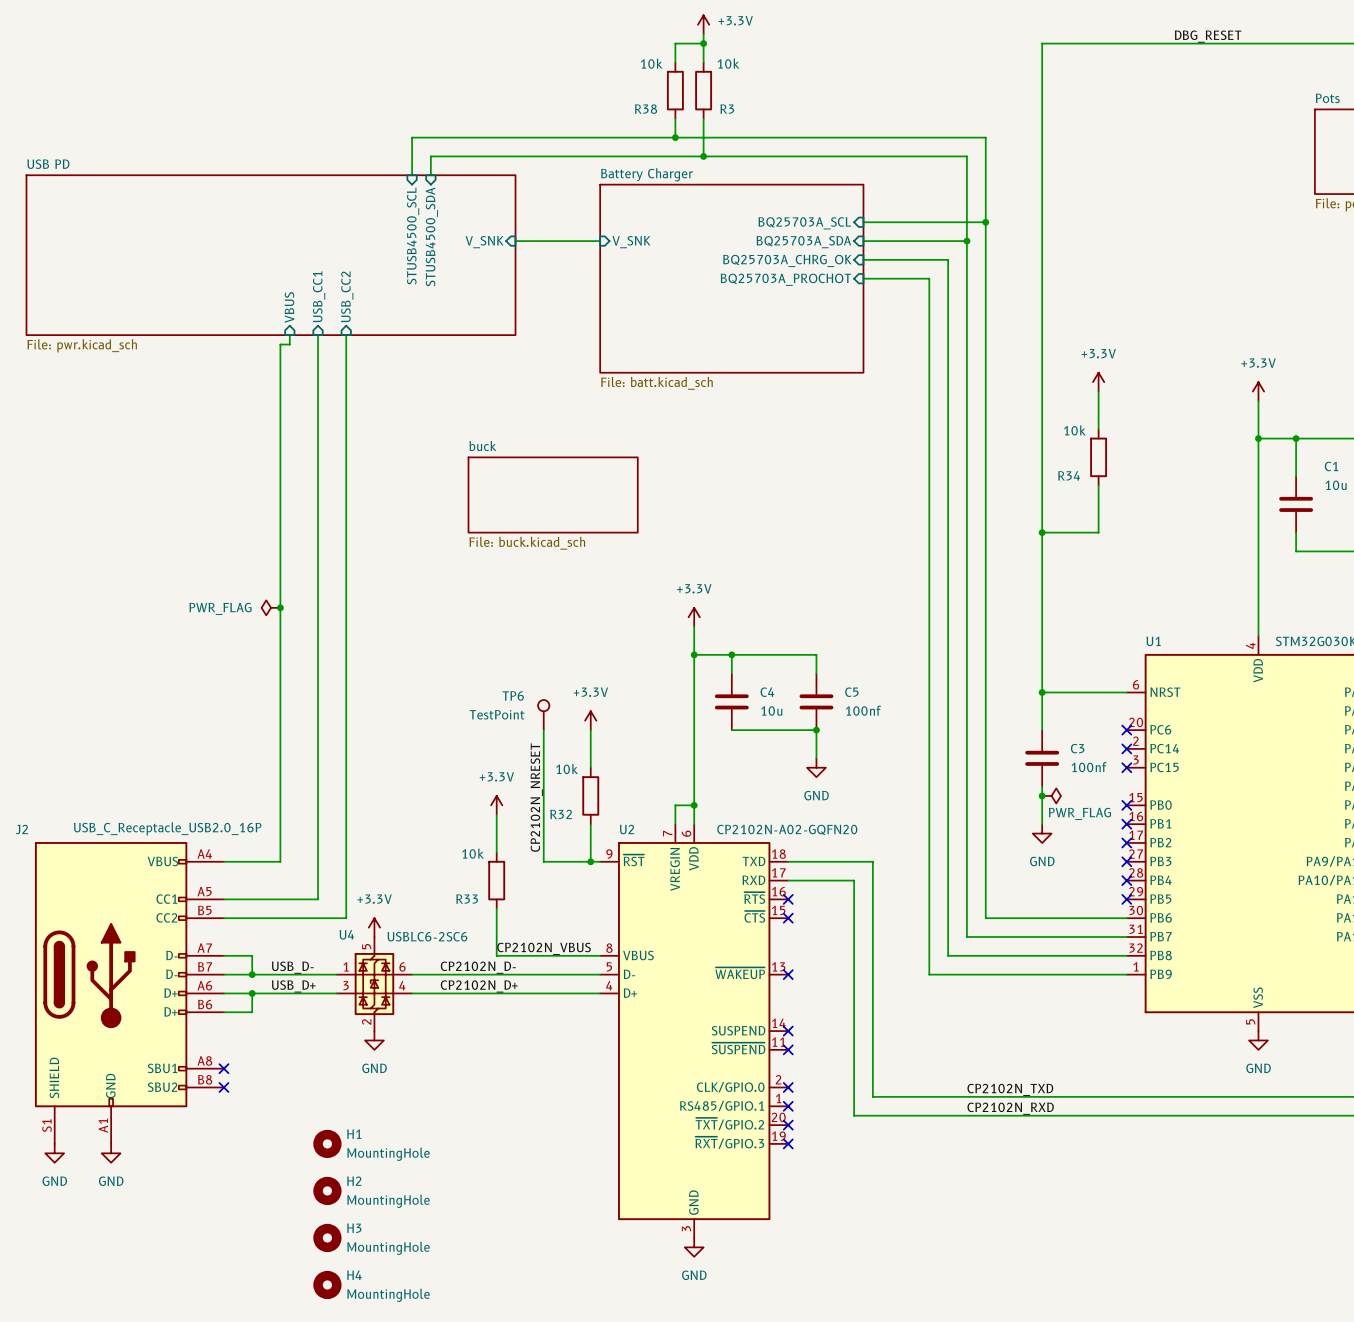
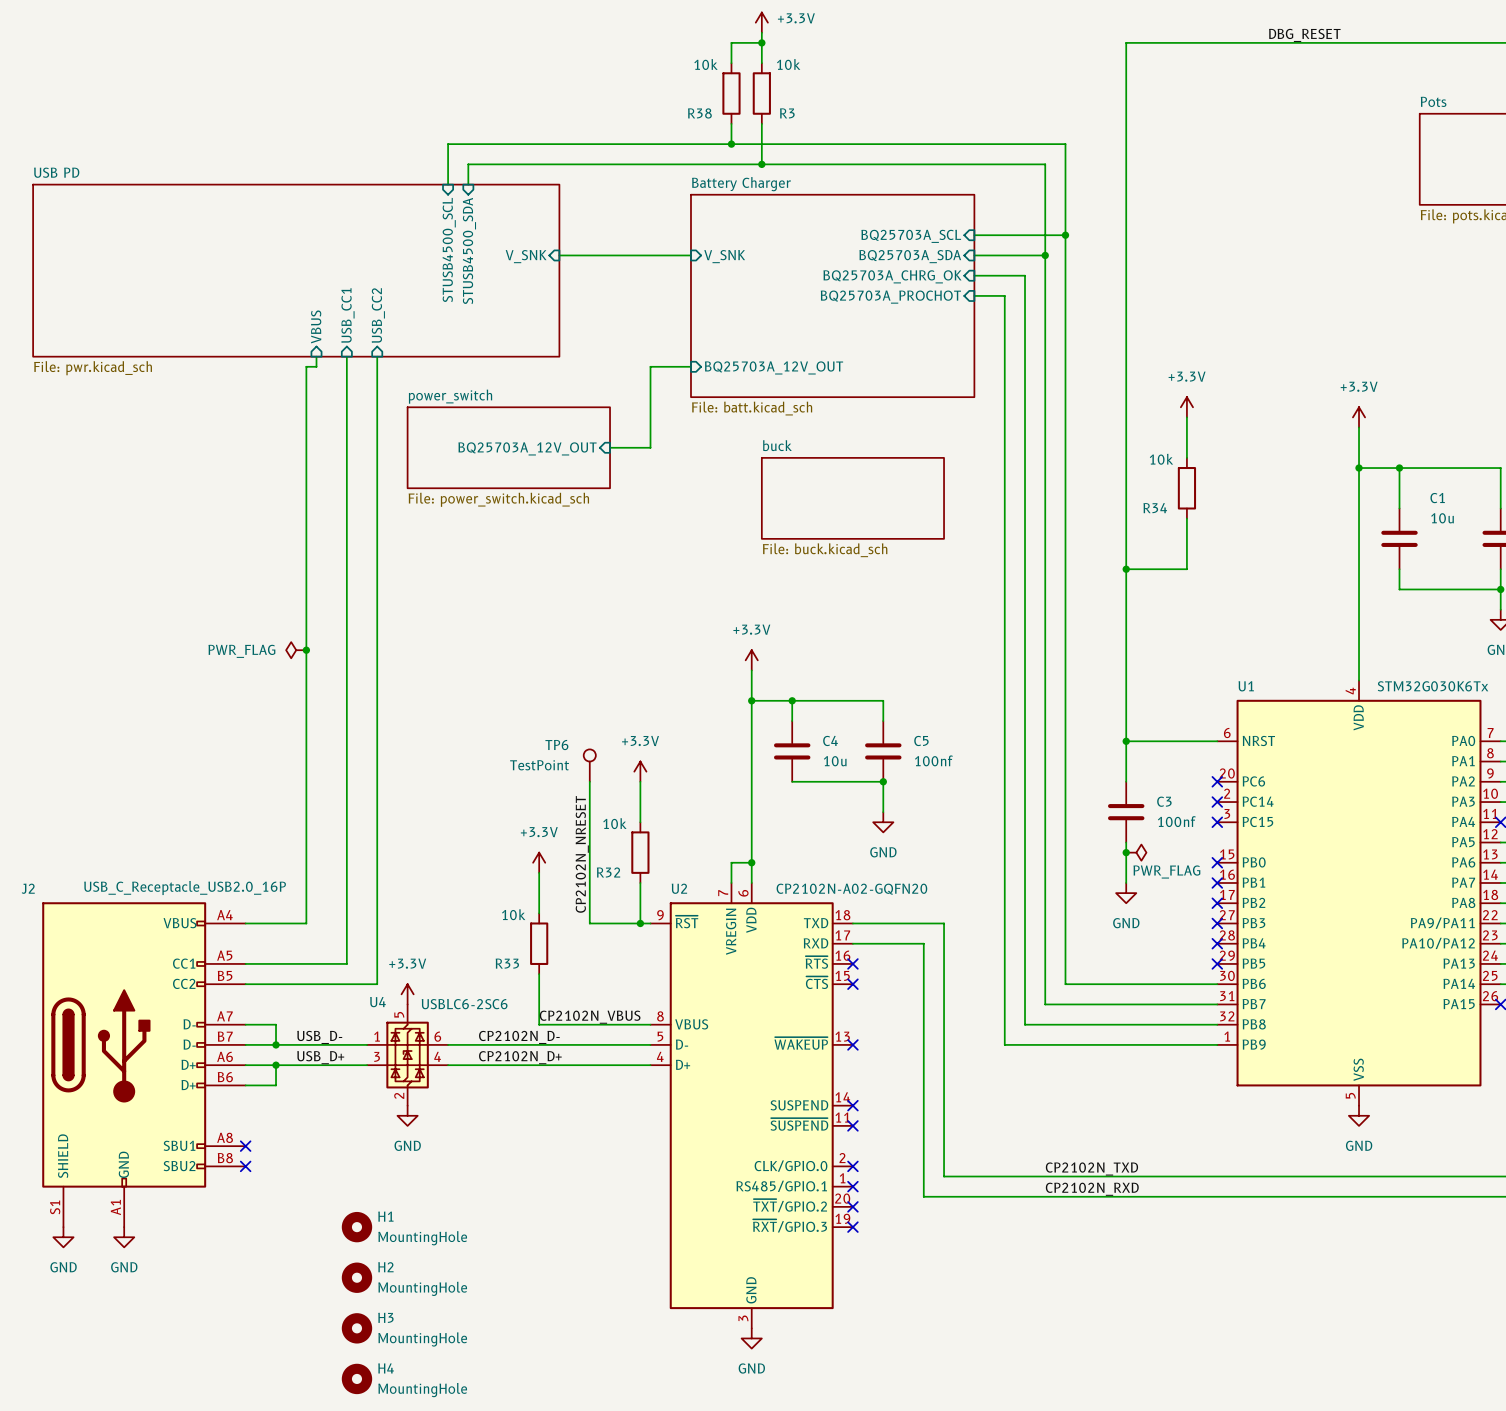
wire: (863, 222) (901, 222) -> none
sheet pin position: BQ25703A_SCL (804, 223) -> BQ25703A_SCL (911, 236)
wire: none -> (650, 255) (690, 255)
wire: (863, 241) (901, 241) -> none
sheet pin position: V_SNK (631, 242) -> V_SNK (724, 256)
sheet pin position: BQ25703A_SDA (803, 242) -> BQ25703A_SDA (910, 256)
wire: (863, 259) (901, 259) -> none
sheet pin position: BQ25703A_CHRG_OK (787, 260) -> BQ25703A_CHRG_OK (892, 276)
sheet Battery Charger position: (731, 278) -> (832, 295)
wire: (863, 278) (901, 278) -> none
sheet pin position: BQ25703A_PROCHOT (785, 279) -> BQ25703A_PROCHOT (890, 297)
wire: none -> (690, 366) (650, 366) (650, 447) (610, 447)
sheet pin: none -> BQ25703A_12V_OUT (774, 367)
sheet power_switch: none -> File: power_switch.kicad_sch (508, 447)
sheet pin: none -> BQ25703A_12V_OUT (527, 448)
sheet buck: none -> File: buck.kicad_sch (852, 498)
sheet buck: File: buck.kicad_sch (553, 495) -> none

